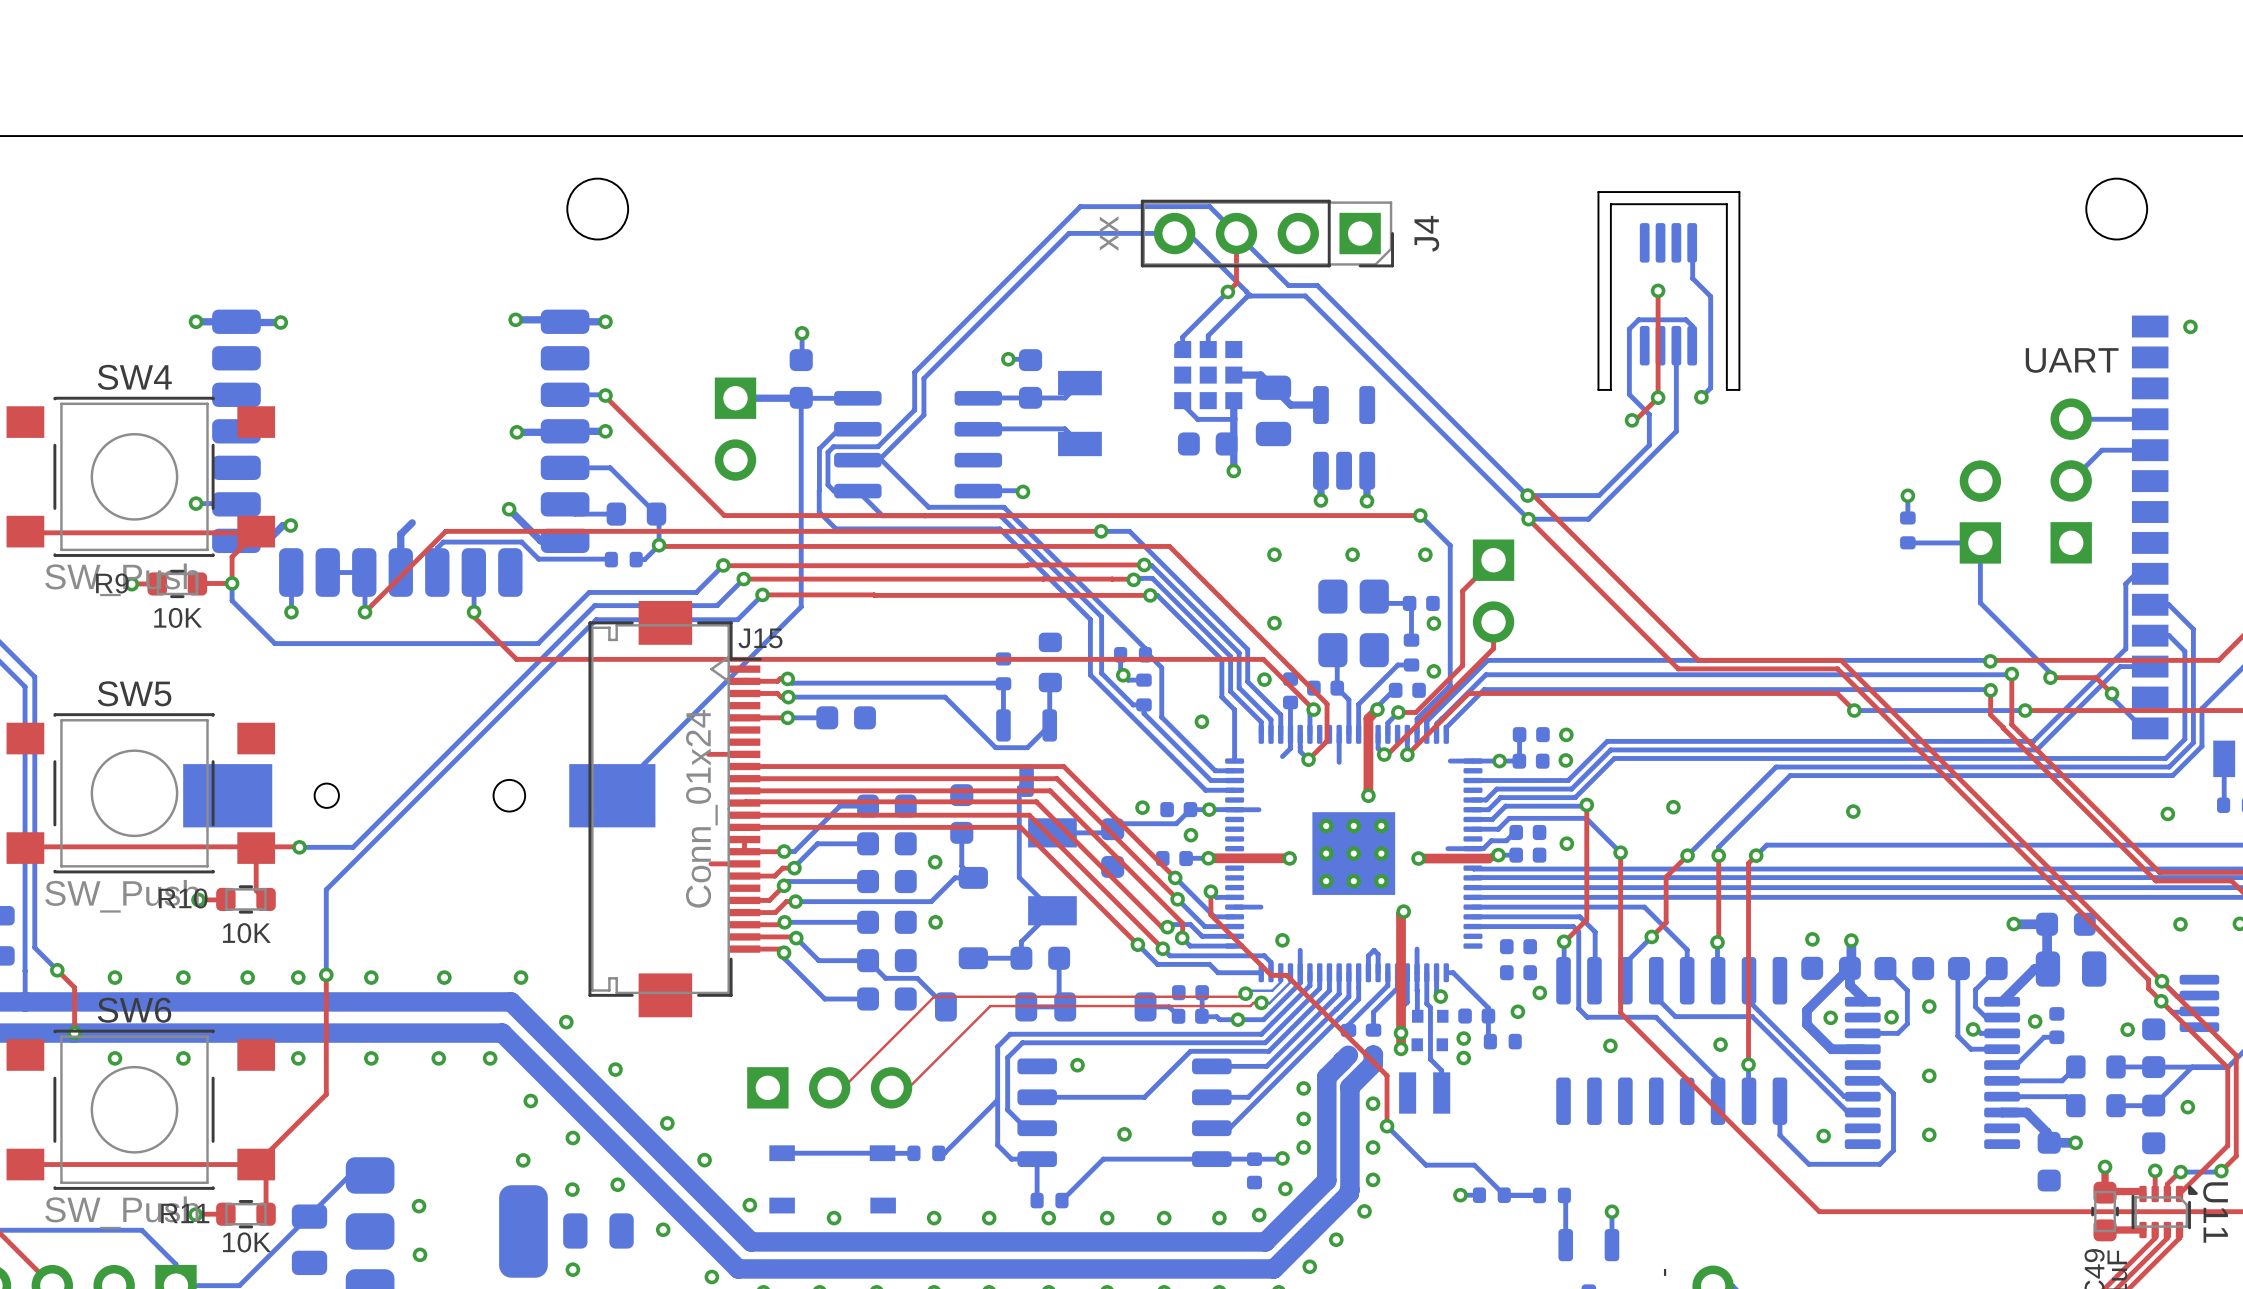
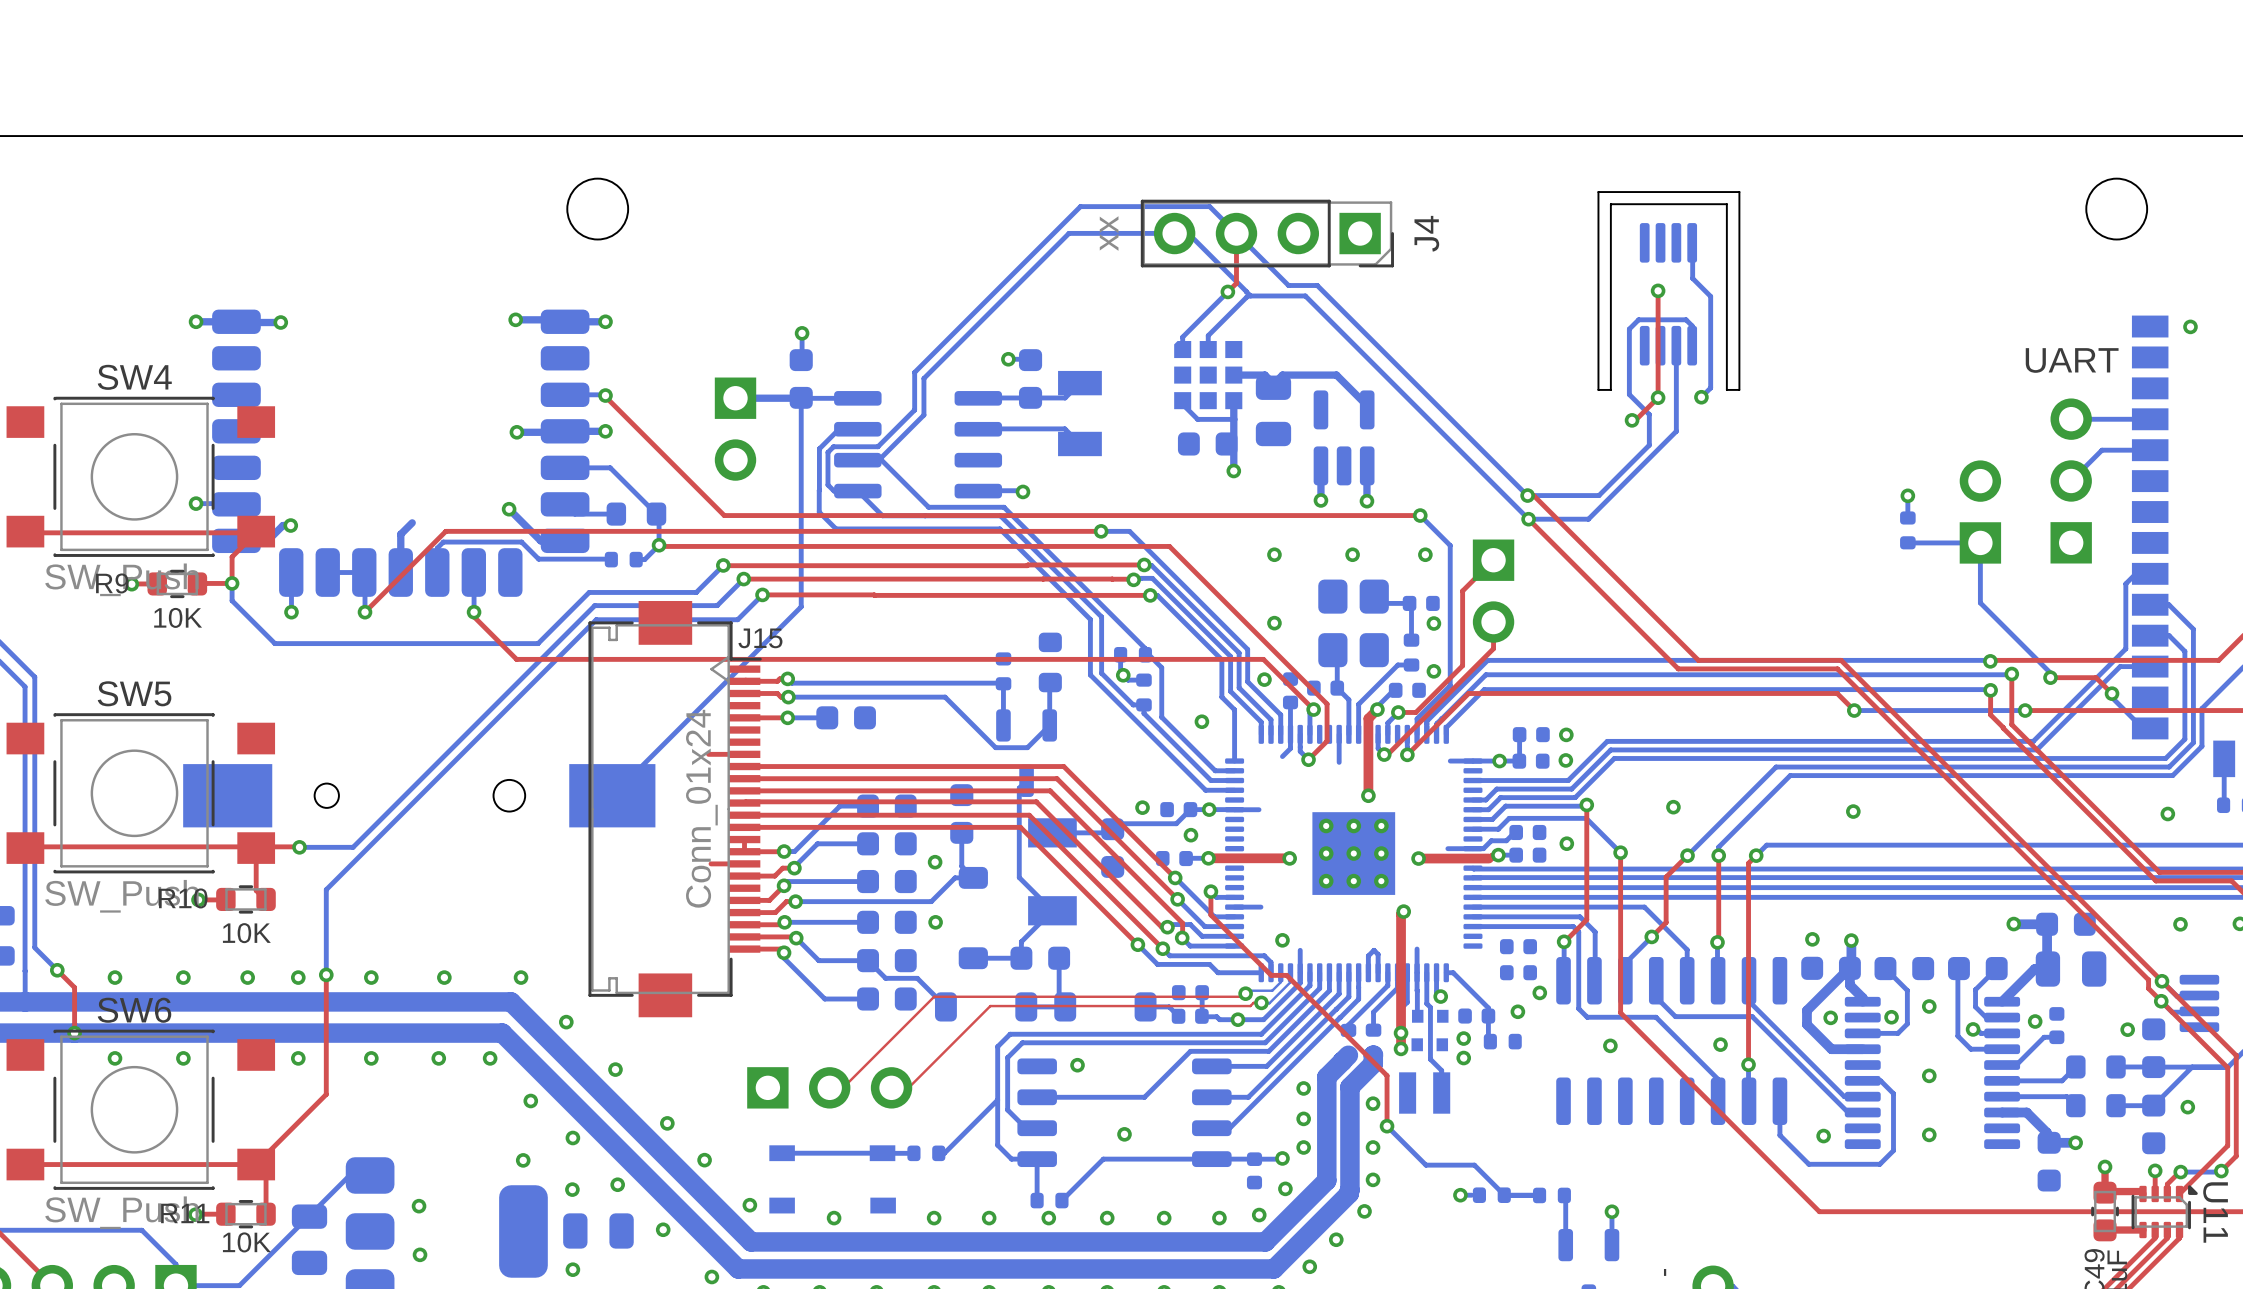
bottom track: (1260, 375) (1290, 405) (1320, 405) -> (1260, 375) (1264, 375) (1273, 383) (1282, 375) (1336, 375) (1367, 405) (1367, 409)
part footprint: [1313, 386, 1376, 490] -> [1313, 390, 1375, 486]

